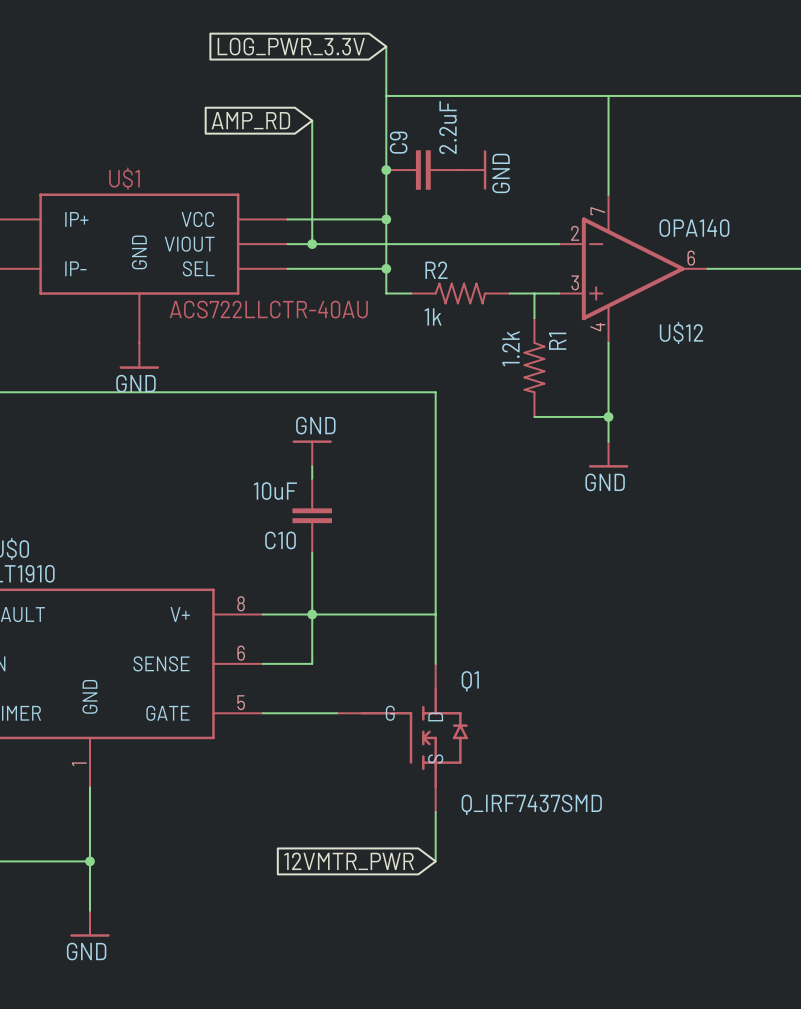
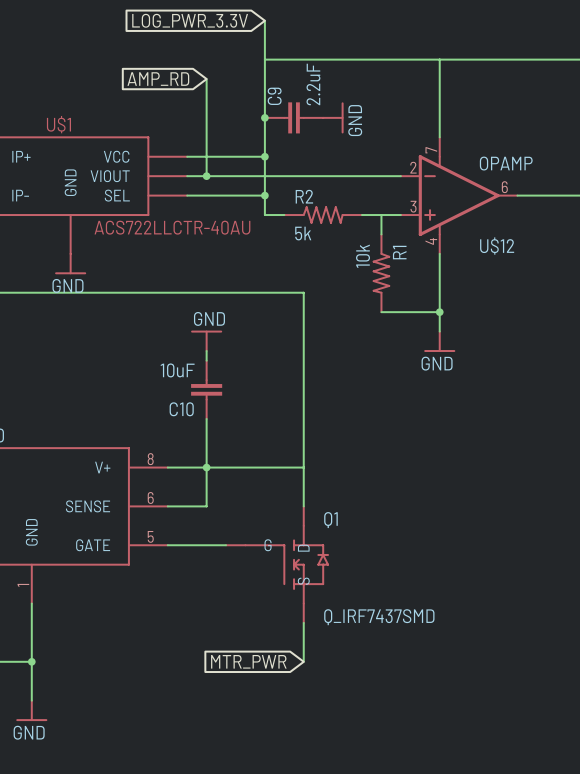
U$12 value: OPA140 (694, 228) -> OPAMP (506, 163)
R2 value: 1k (433, 316) -> 5k (303, 233)
R1 value: 1.2k (510, 348) -> 10k (363, 256)
global label: 12VMTR_PWR (349, 861) -> MTR_PWR (248, 661)

